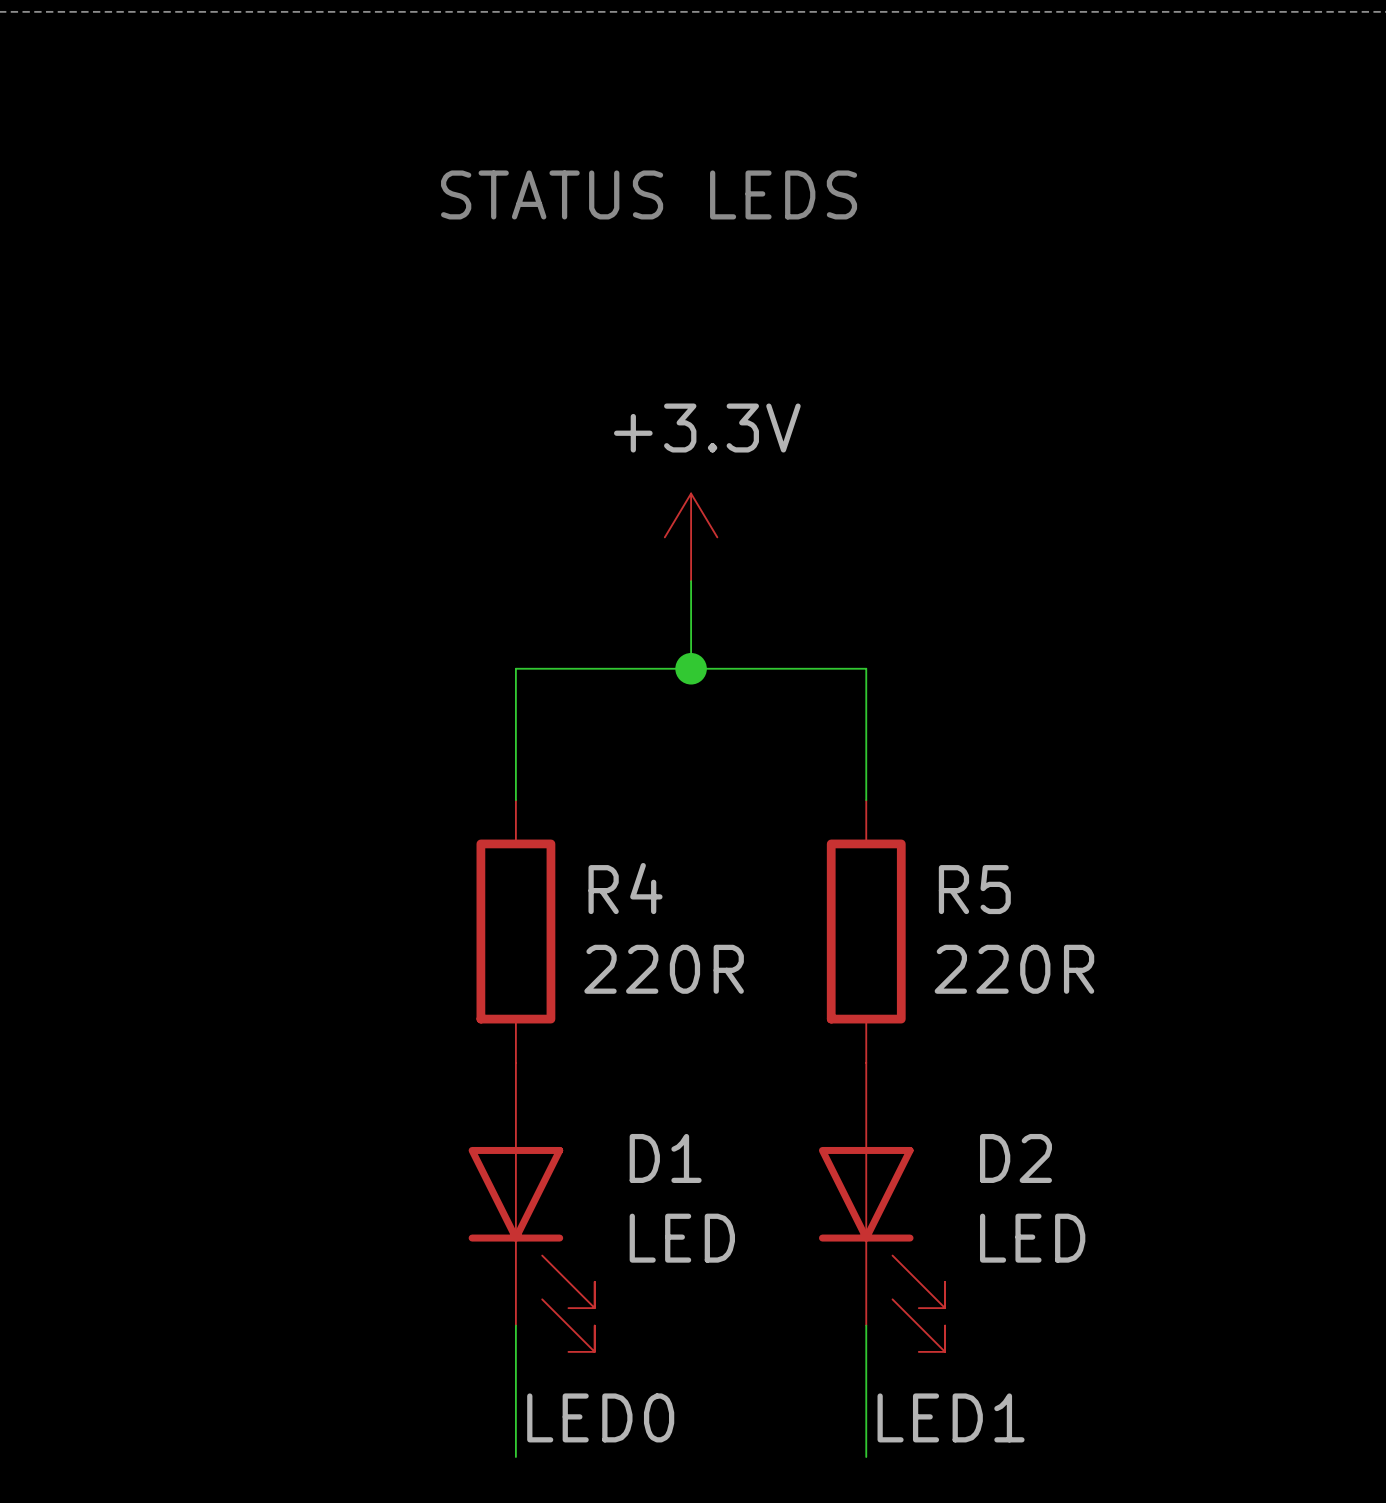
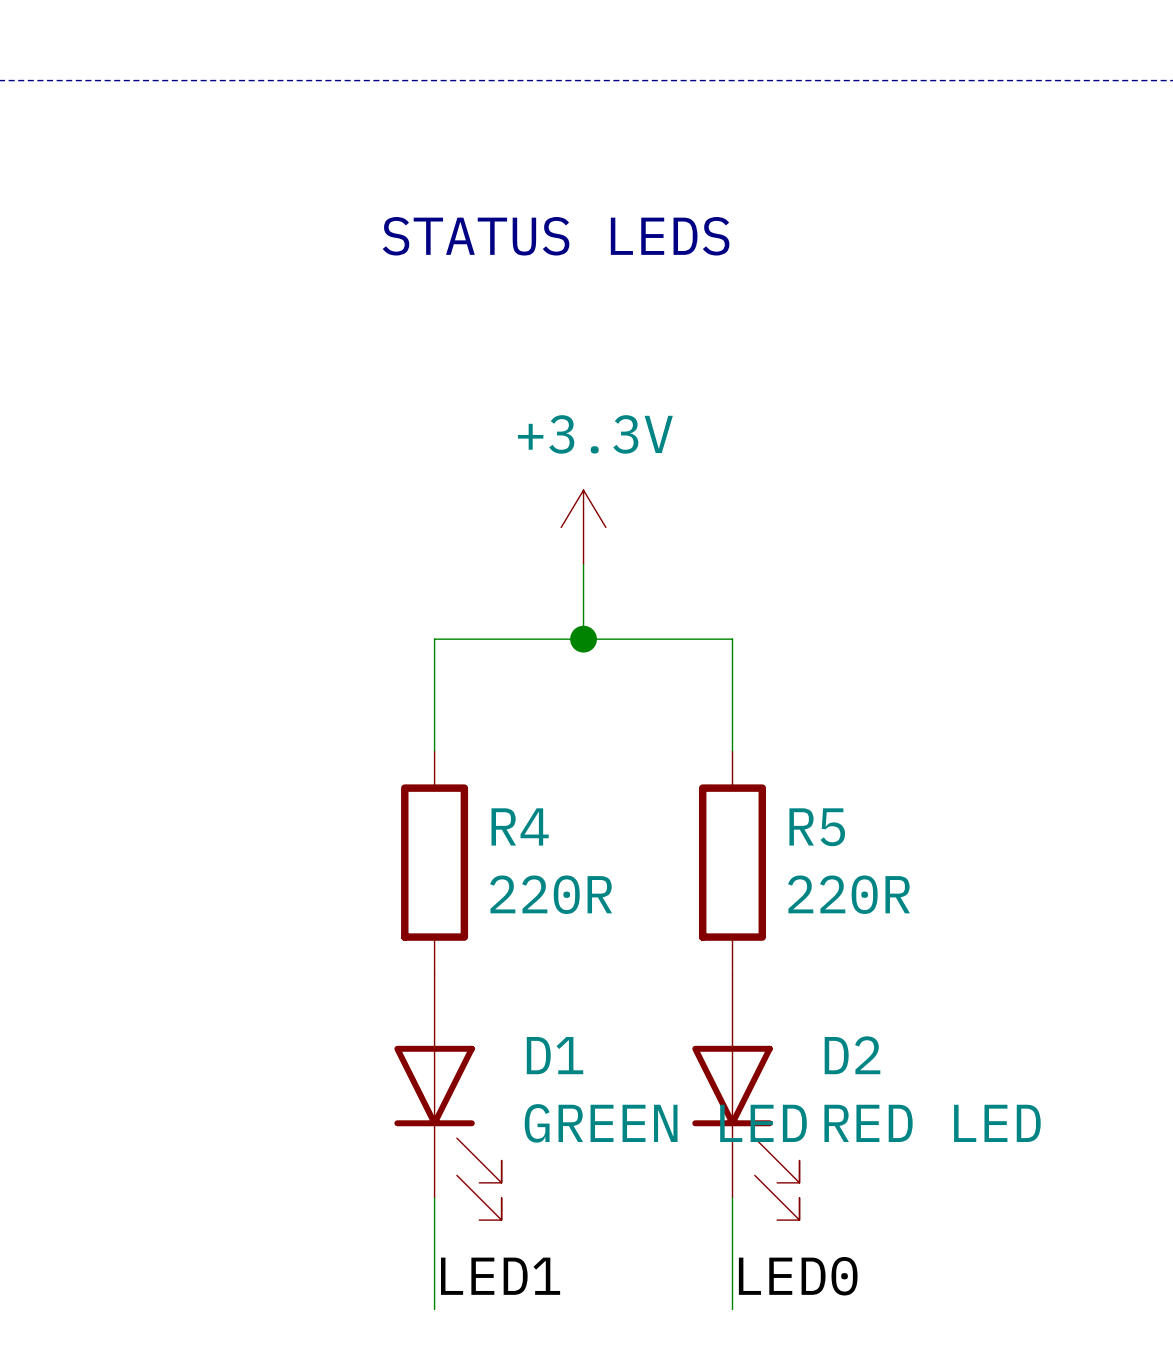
D1 value: LED (682, 1238) -> GREEN LED (665, 1123)
D2 value: LED (1032, 1238) -> RED LED (932, 1123)
label: LED0 (600, 1417) -> LED1 (500, 1276)
label: LED1 (951, 1417) -> LED0 (798, 1276)

